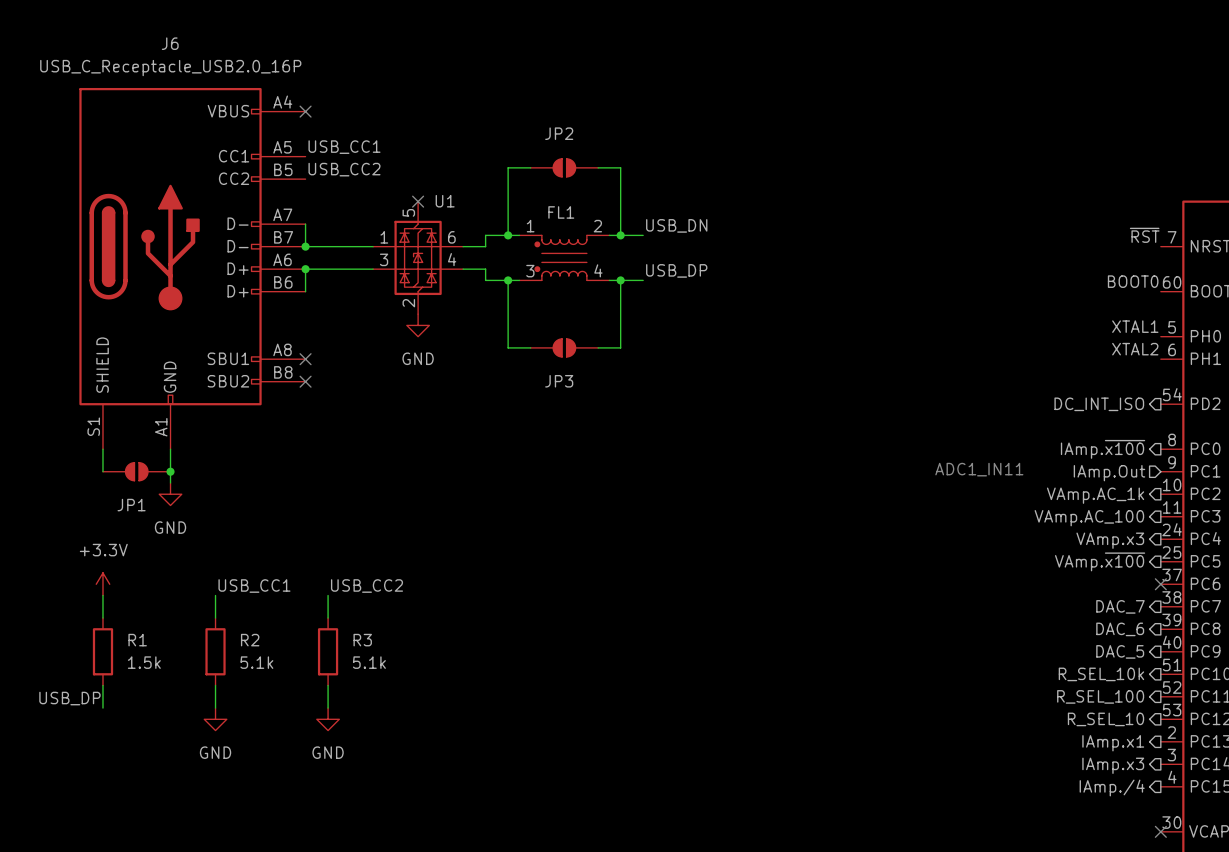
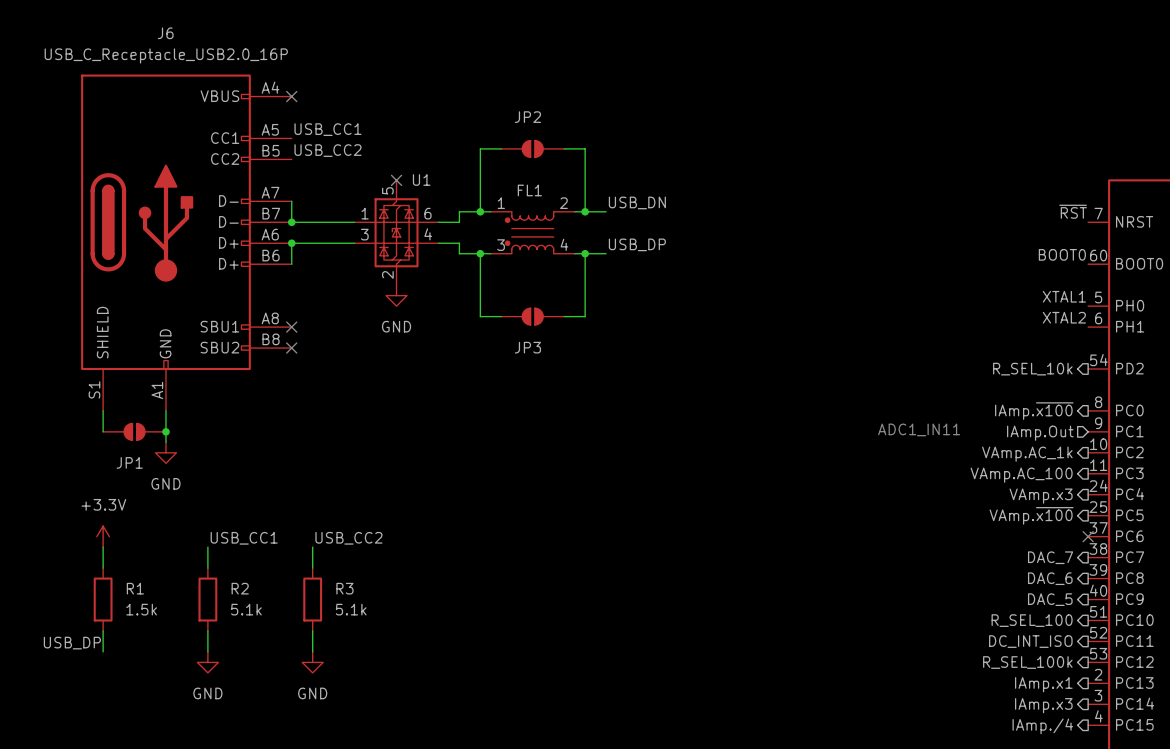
hierarchical label: DC_INT_ISO (1099, 404) -> R_SEL_10k (1032, 369)
hierarchical label: R_SEL_10k (1101, 674) -> R_SEL_100 (1032, 620)
hierarchical label: R_SEL_100 (1100, 696) -> DC_INT_ISO (1030, 641)
hierarchical label: R_SEL_10 (1106, 719) -> R_SEL_100k (1027, 662)

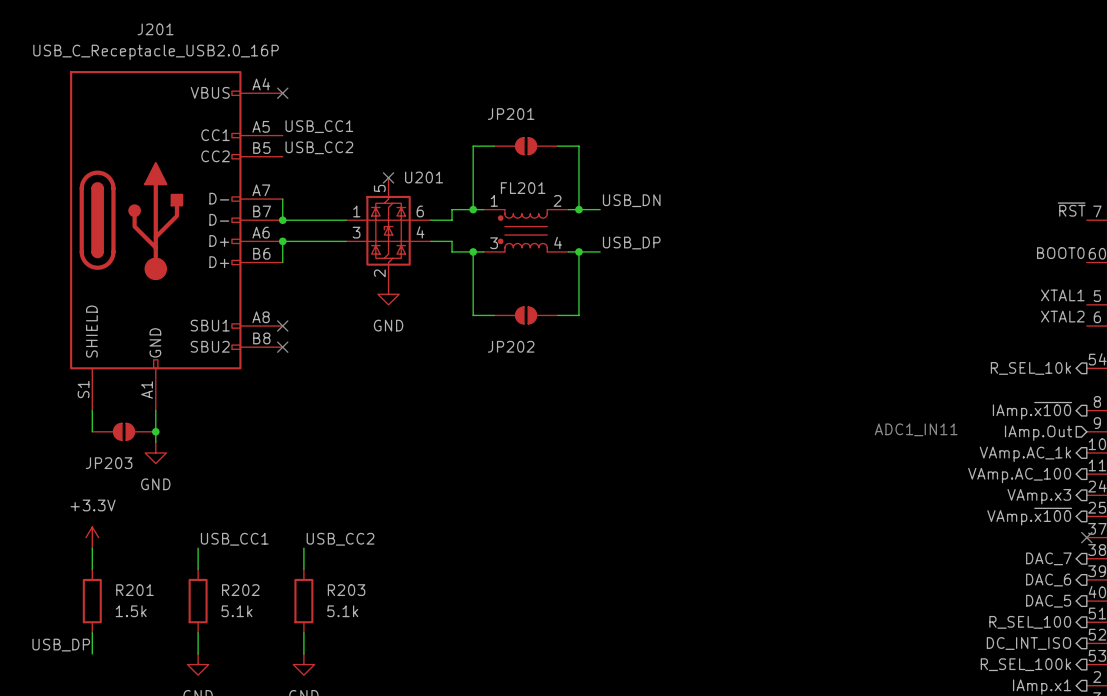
J6 name: J6 (165, 33) -> J201 (155, 29)
JP2 name: JP2 (527, 117) -> JP201 (511, 114)
U1 name: U1 (421, 179) -> U201 (424, 177)
FL1 name: FL1 (529, 190) -> FL201 (523, 188)
JP3 name: JP3 (527, 347) -> JP202 (511, 346)
JP1 name: JP1 (129, 462) -> JP203 (109, 463)
R1 name: R1 (135, 588) -> R201 (134, 590)
R2 name: R2 (240, 588) -> R202 (240, 590)
R3 name: R3 (344, 588) -> R203 (346, 590)

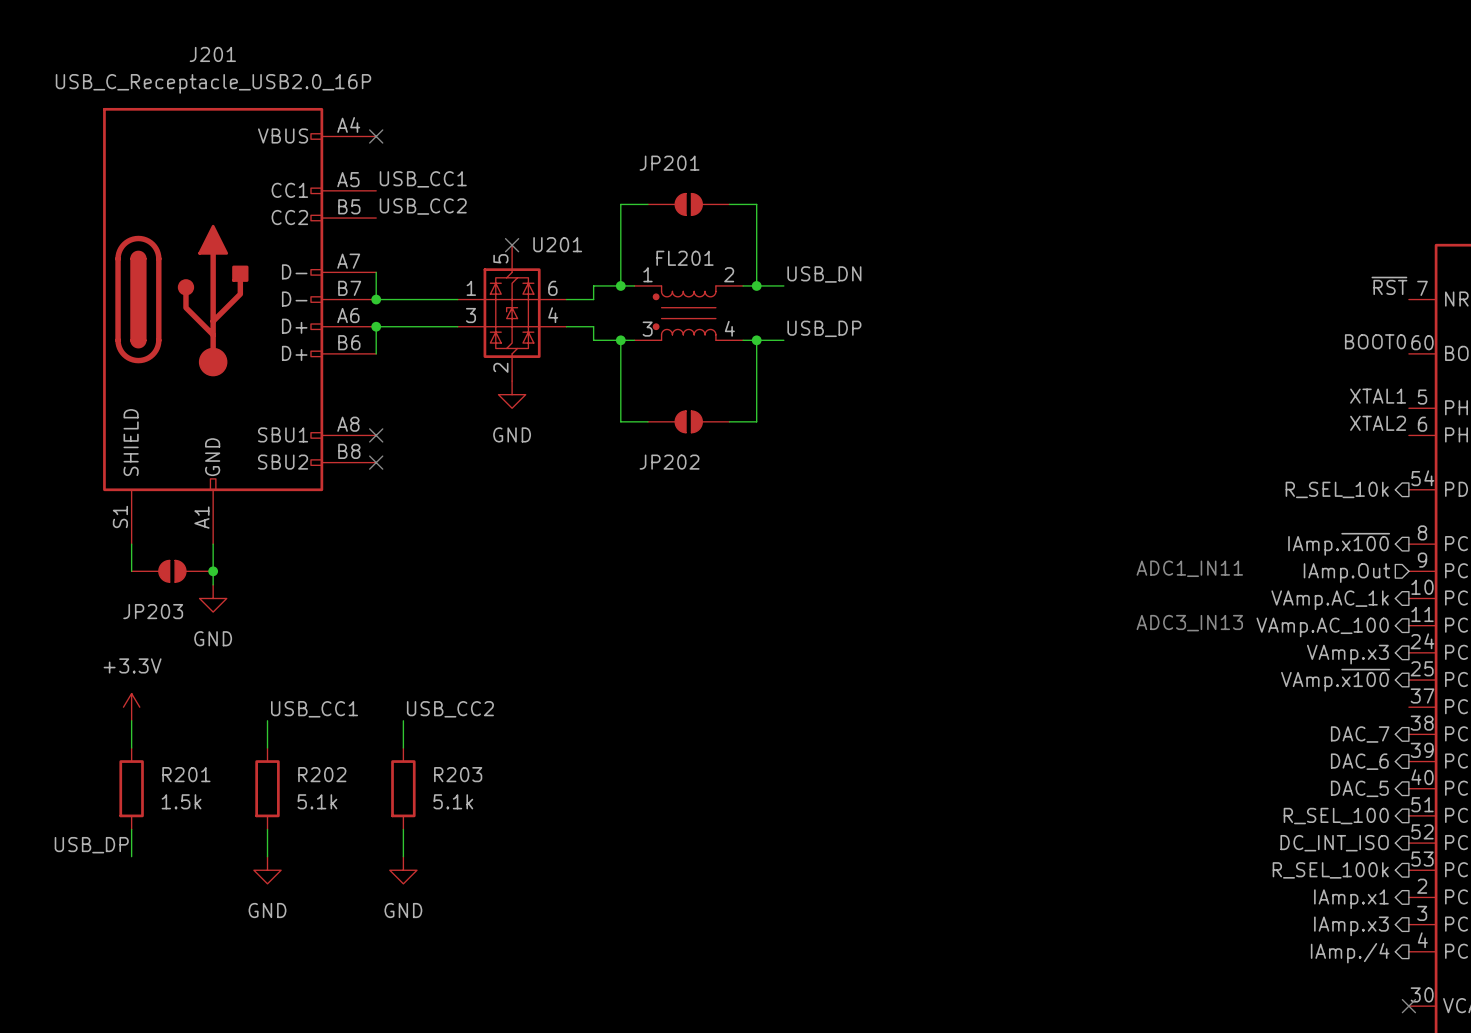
text: none -> ADC3_IN13 (1189, 623)
no-connect mark: (1086, 537) -> none

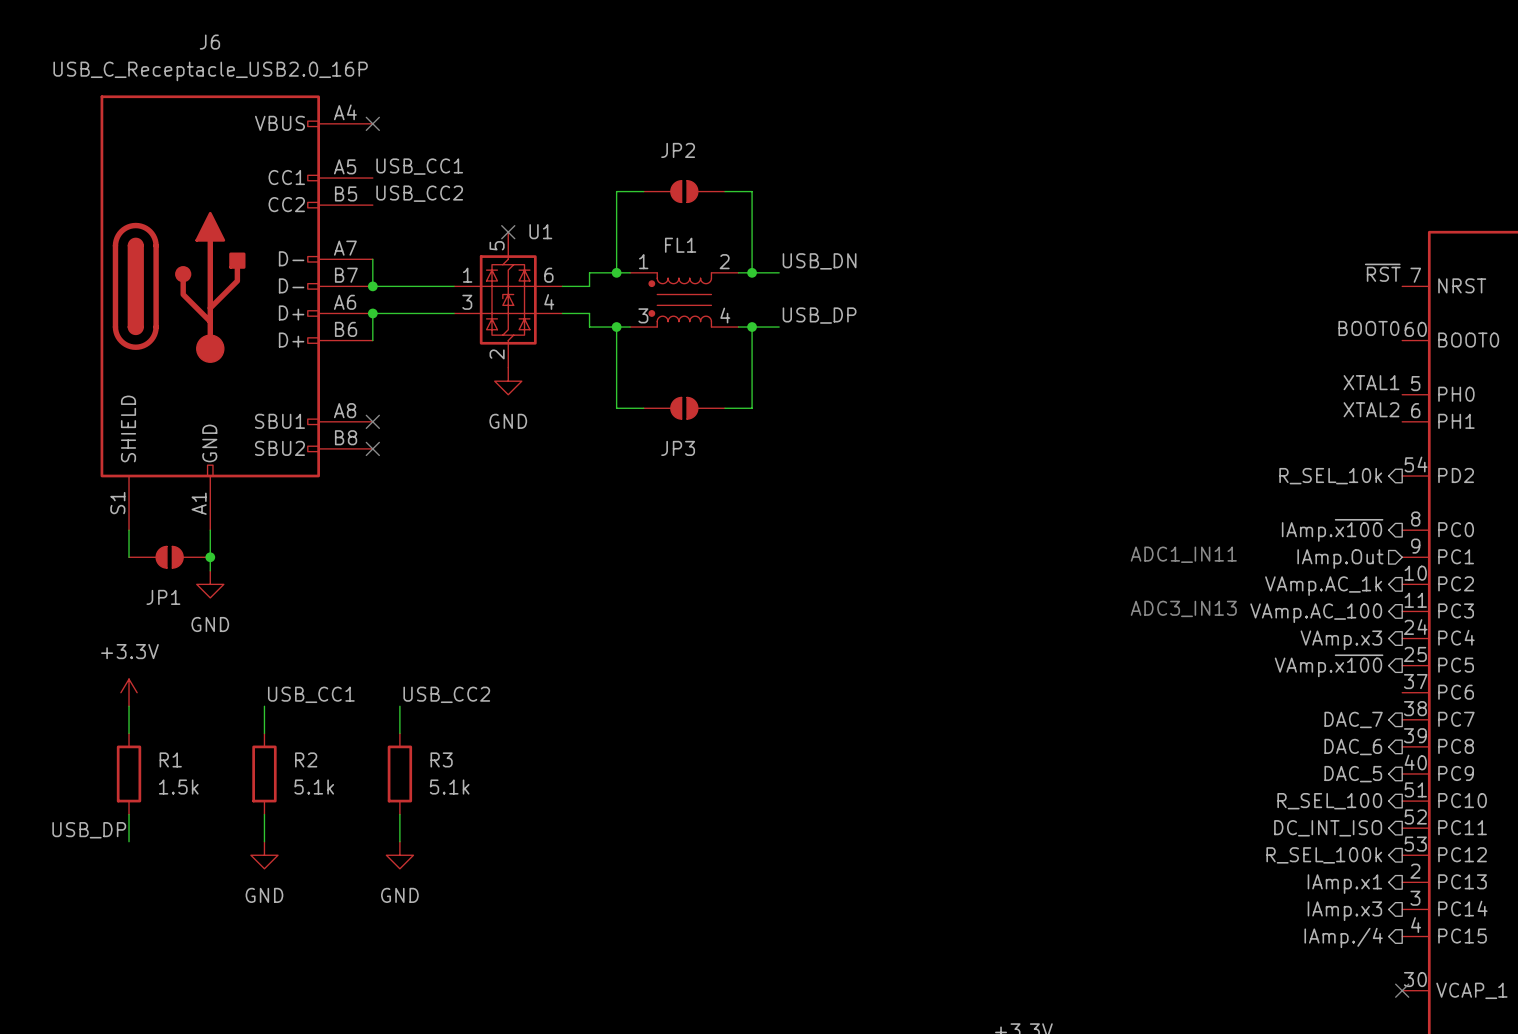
J201 name: J201 (212, 54) -> J6 (209, 42)
JP201 name: JP201 (669, 163) -> JP2 (678, 150)
U201 name: U201 (557, 244) -> U1 (540, 231)
FL201 name: FL201 (684, 258) -> FL1 (680, 245)
JP202 name: JP202 (669, 462) -> JP3 (678, 448)
JP203 name: JP203 (153, 611) -> JP1 (163, 597)
R201 name: R201 (186, 774) -> R1 (170, 759)
R202 name: R202 (322, 774) -> R2 (306, 759)
R203 name: R203 (458, 774) -> R3 (441, 759)

